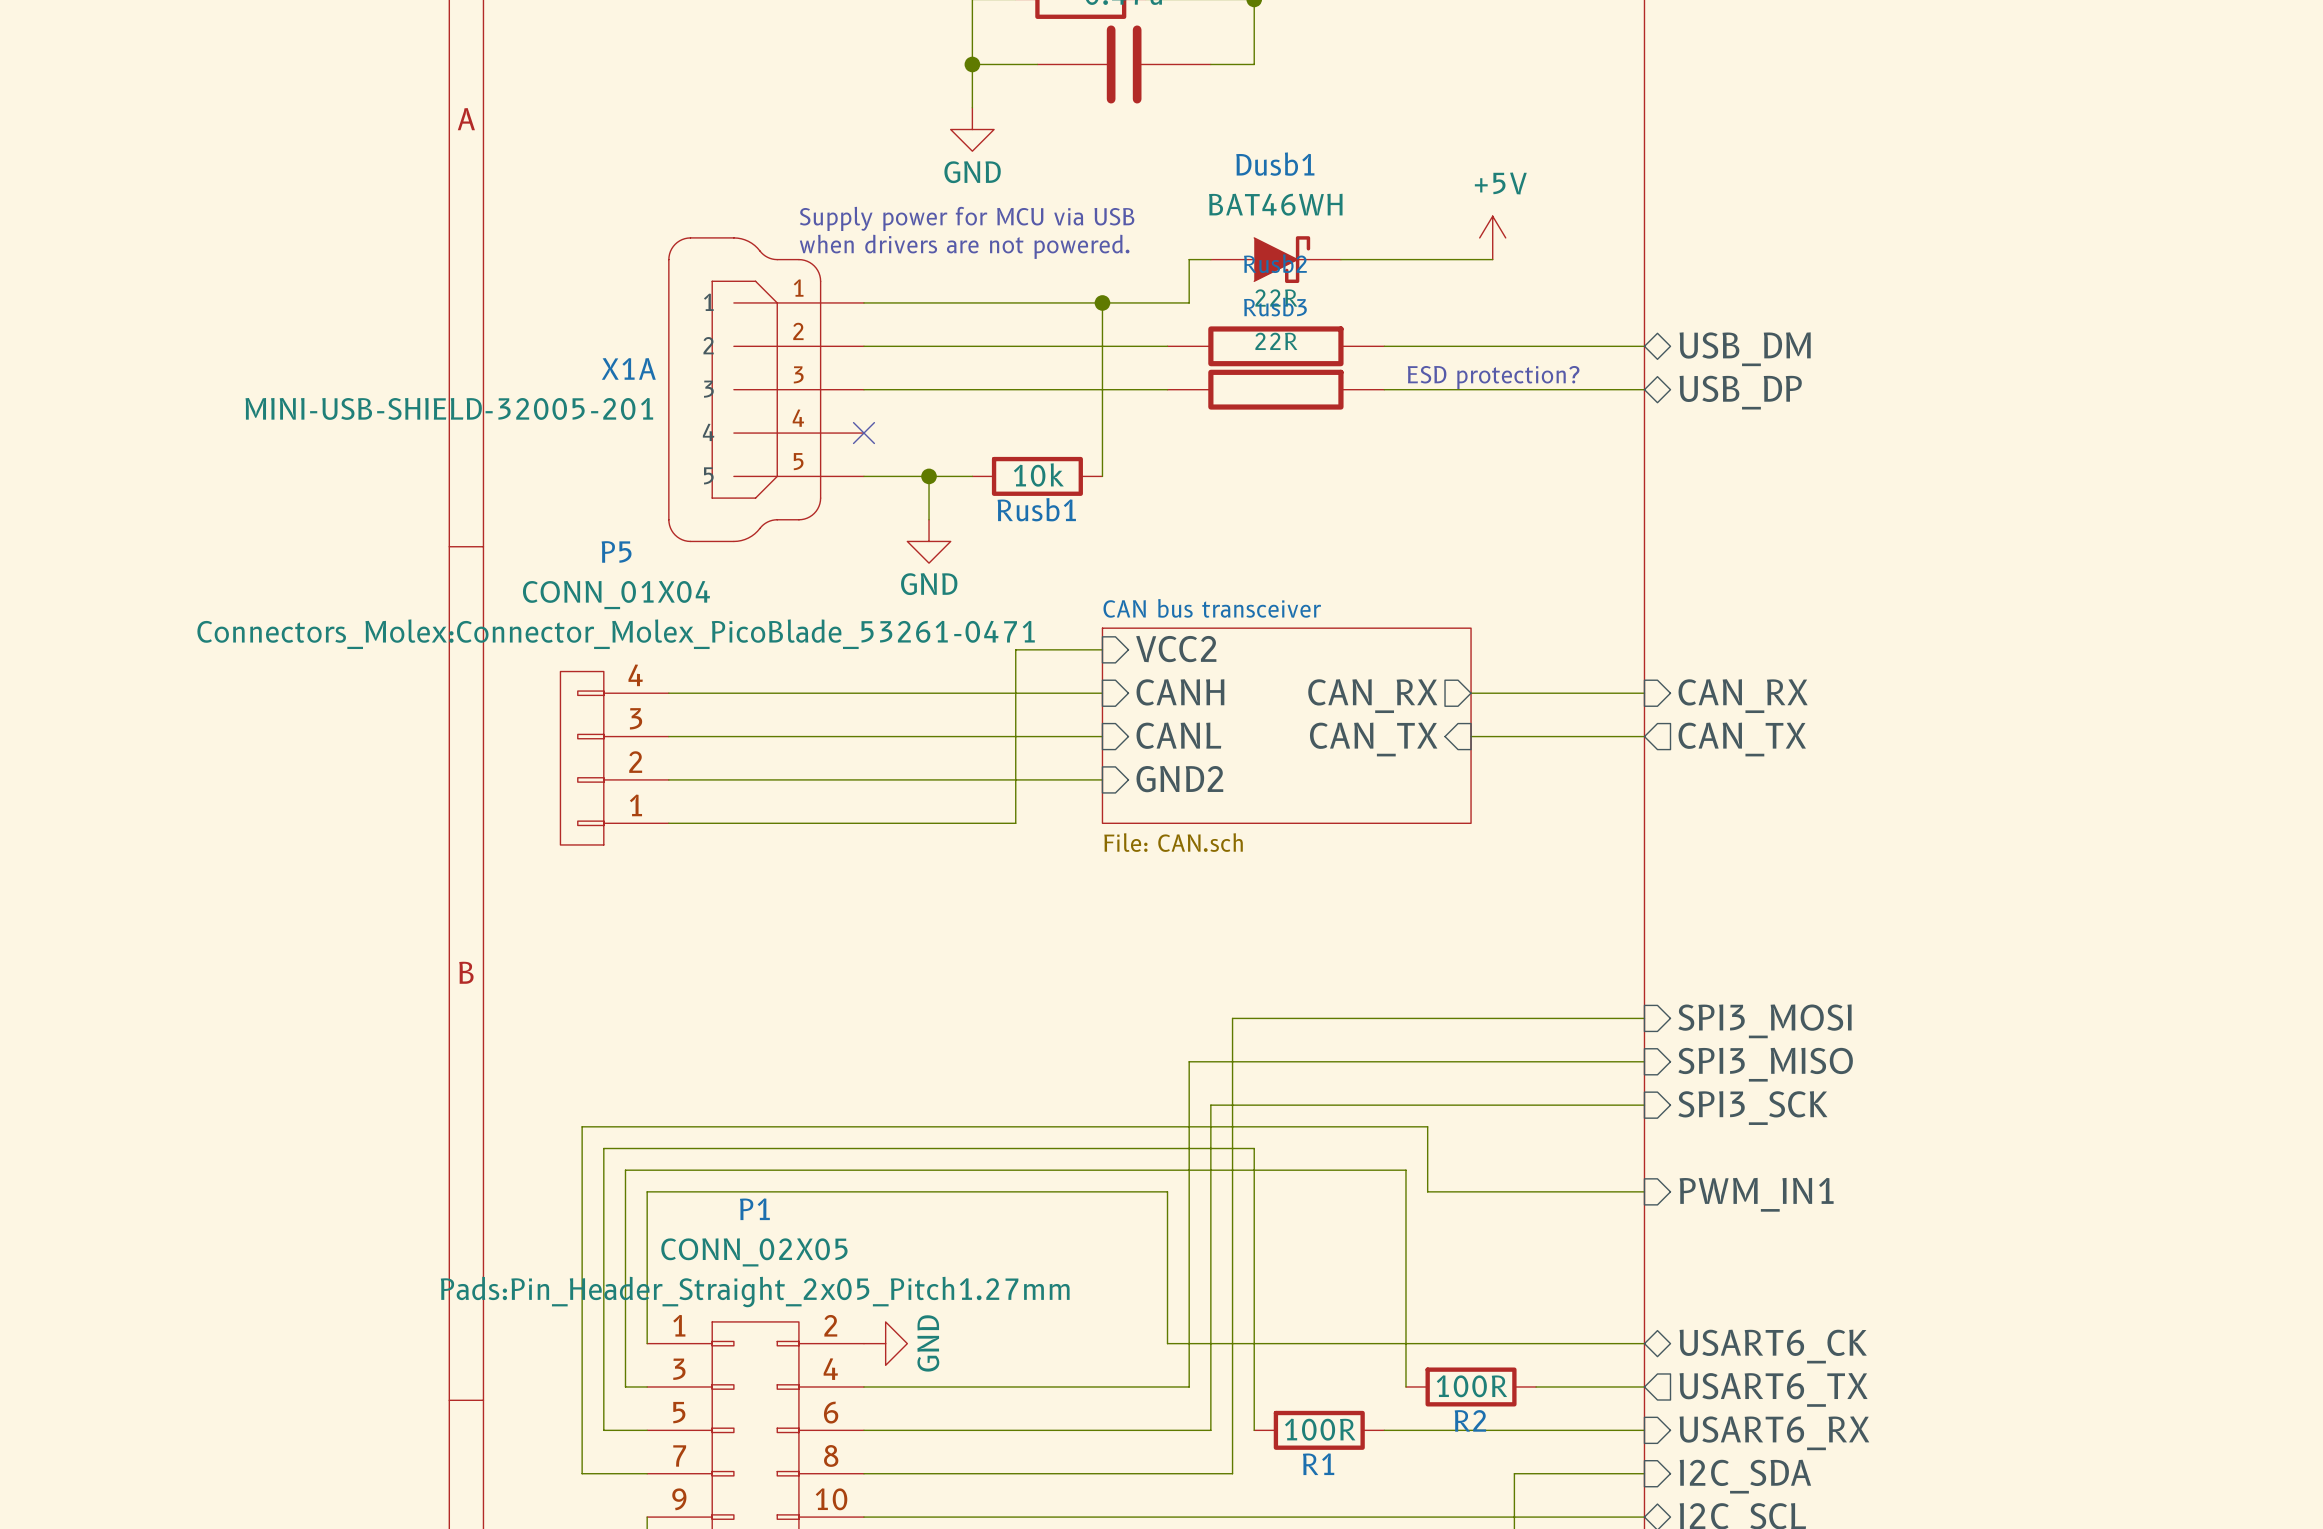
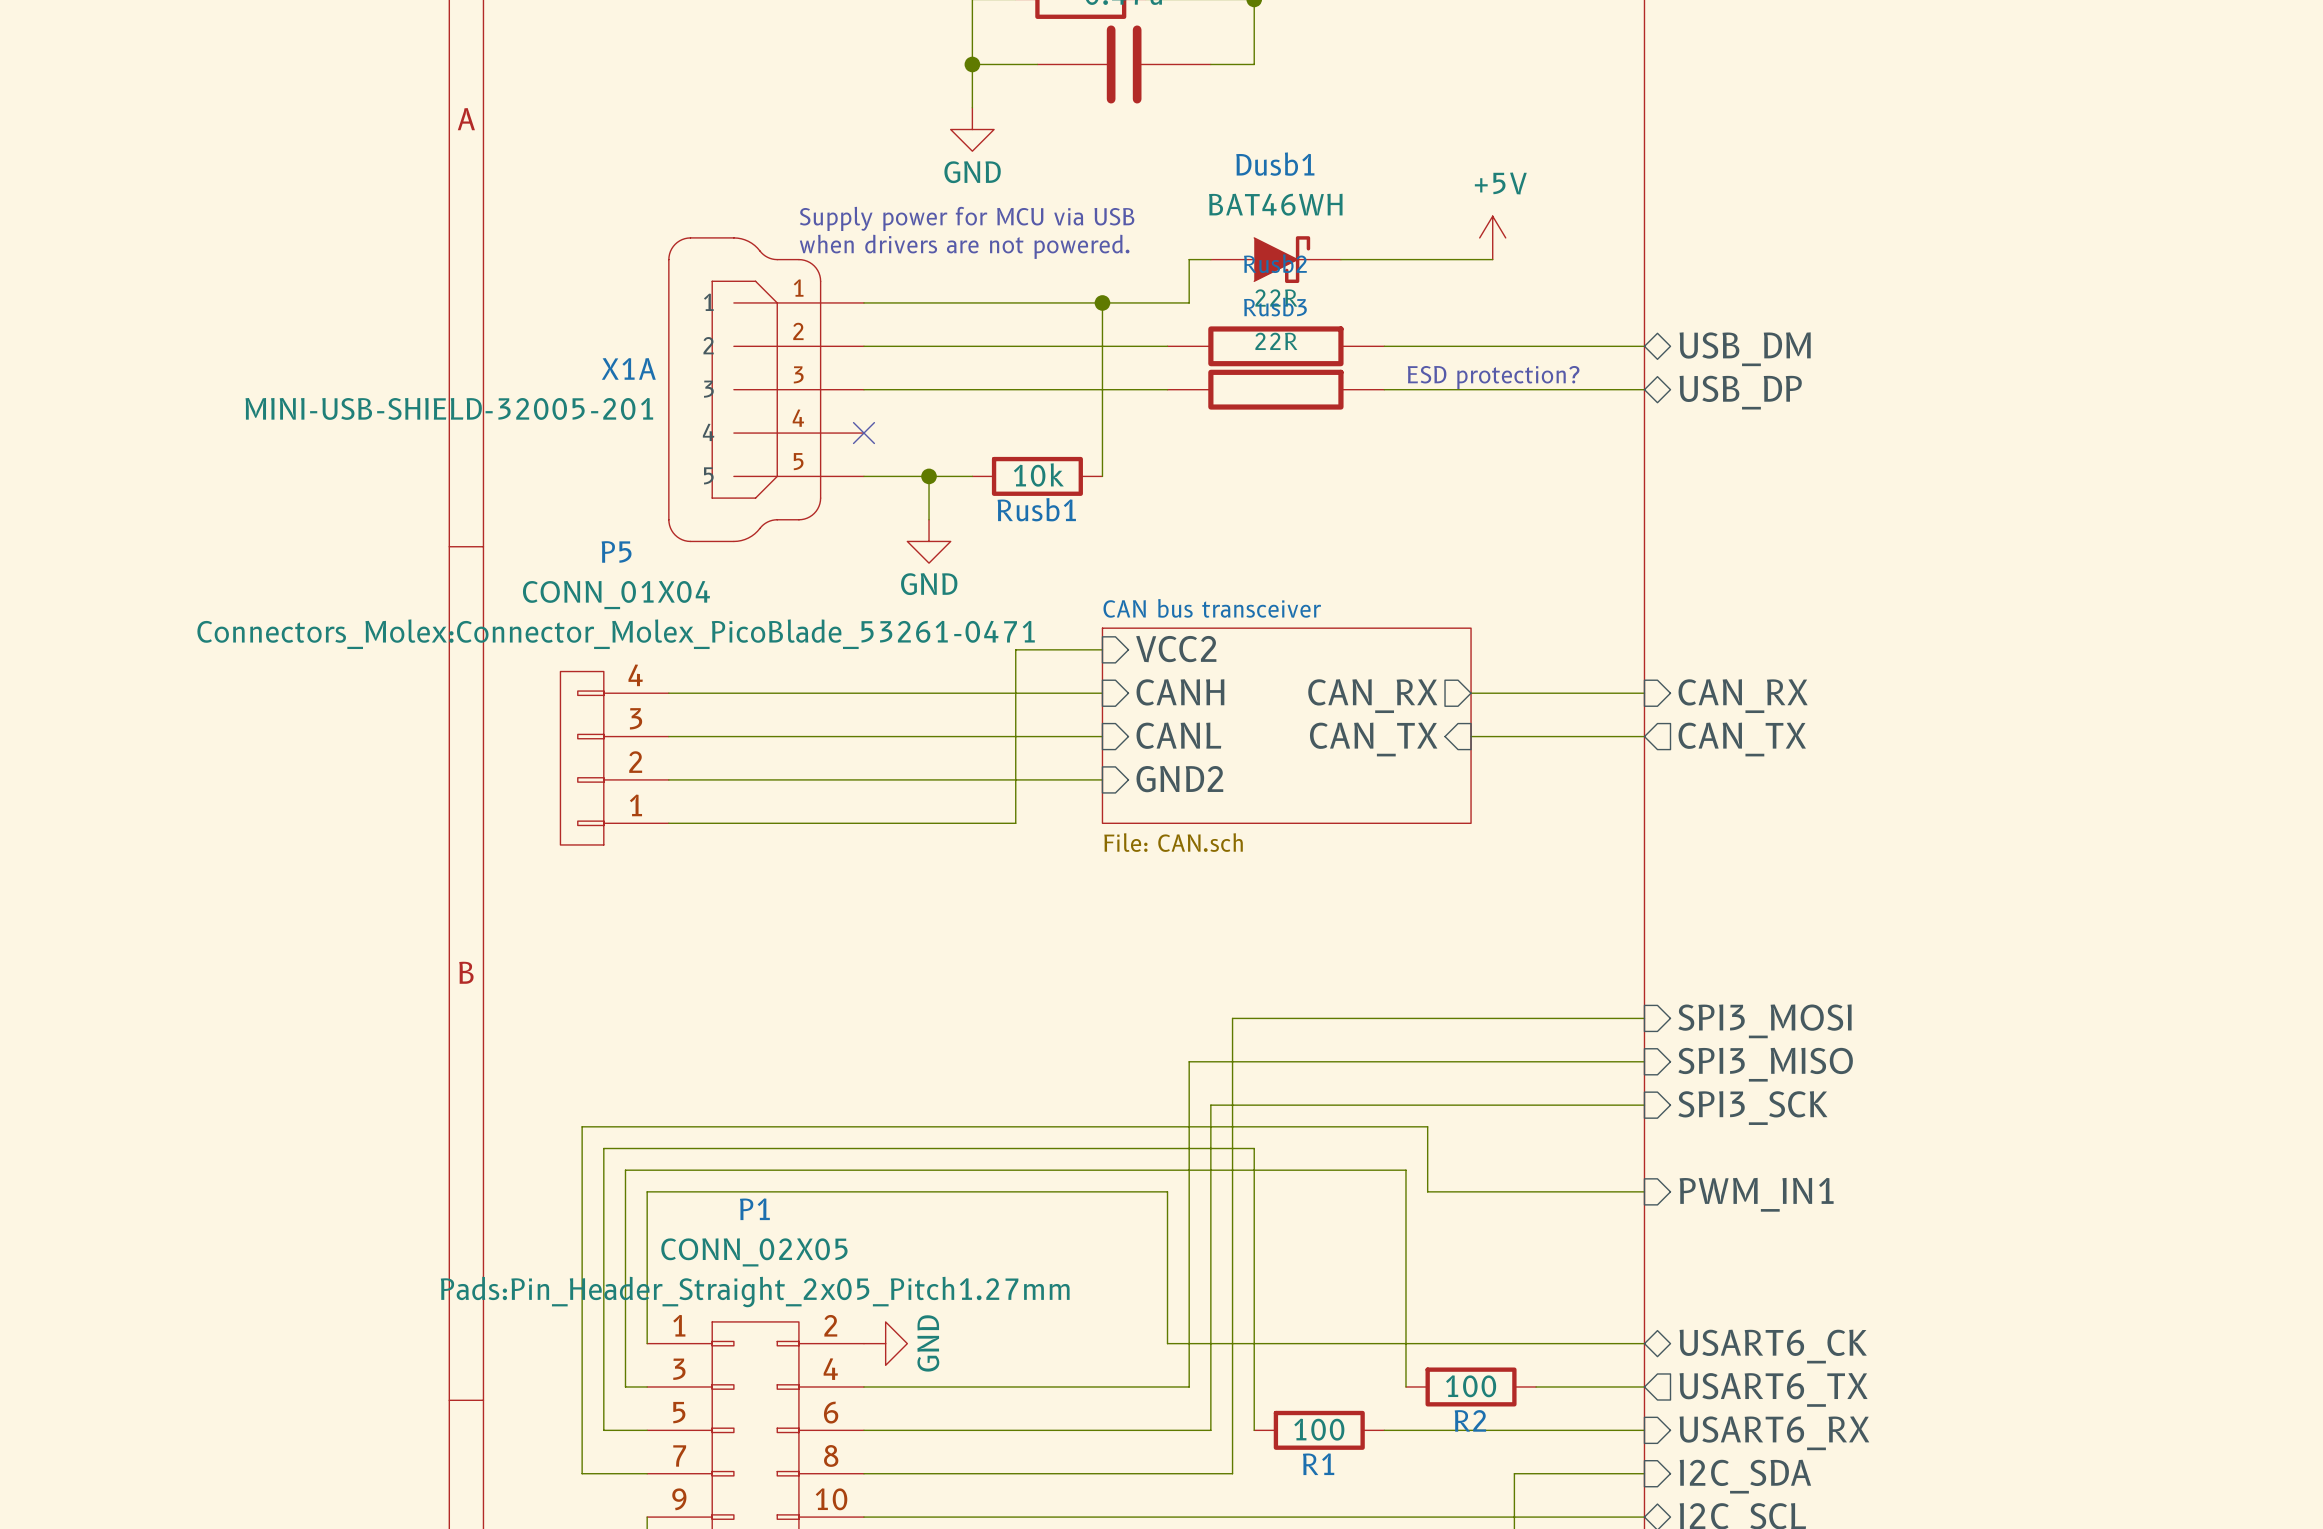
R2 value: 100R (1471, 1386) -> 100 (1471, 1386)
R1 value: 100R (1320, 1429) -> 100 (1319, 1429)

